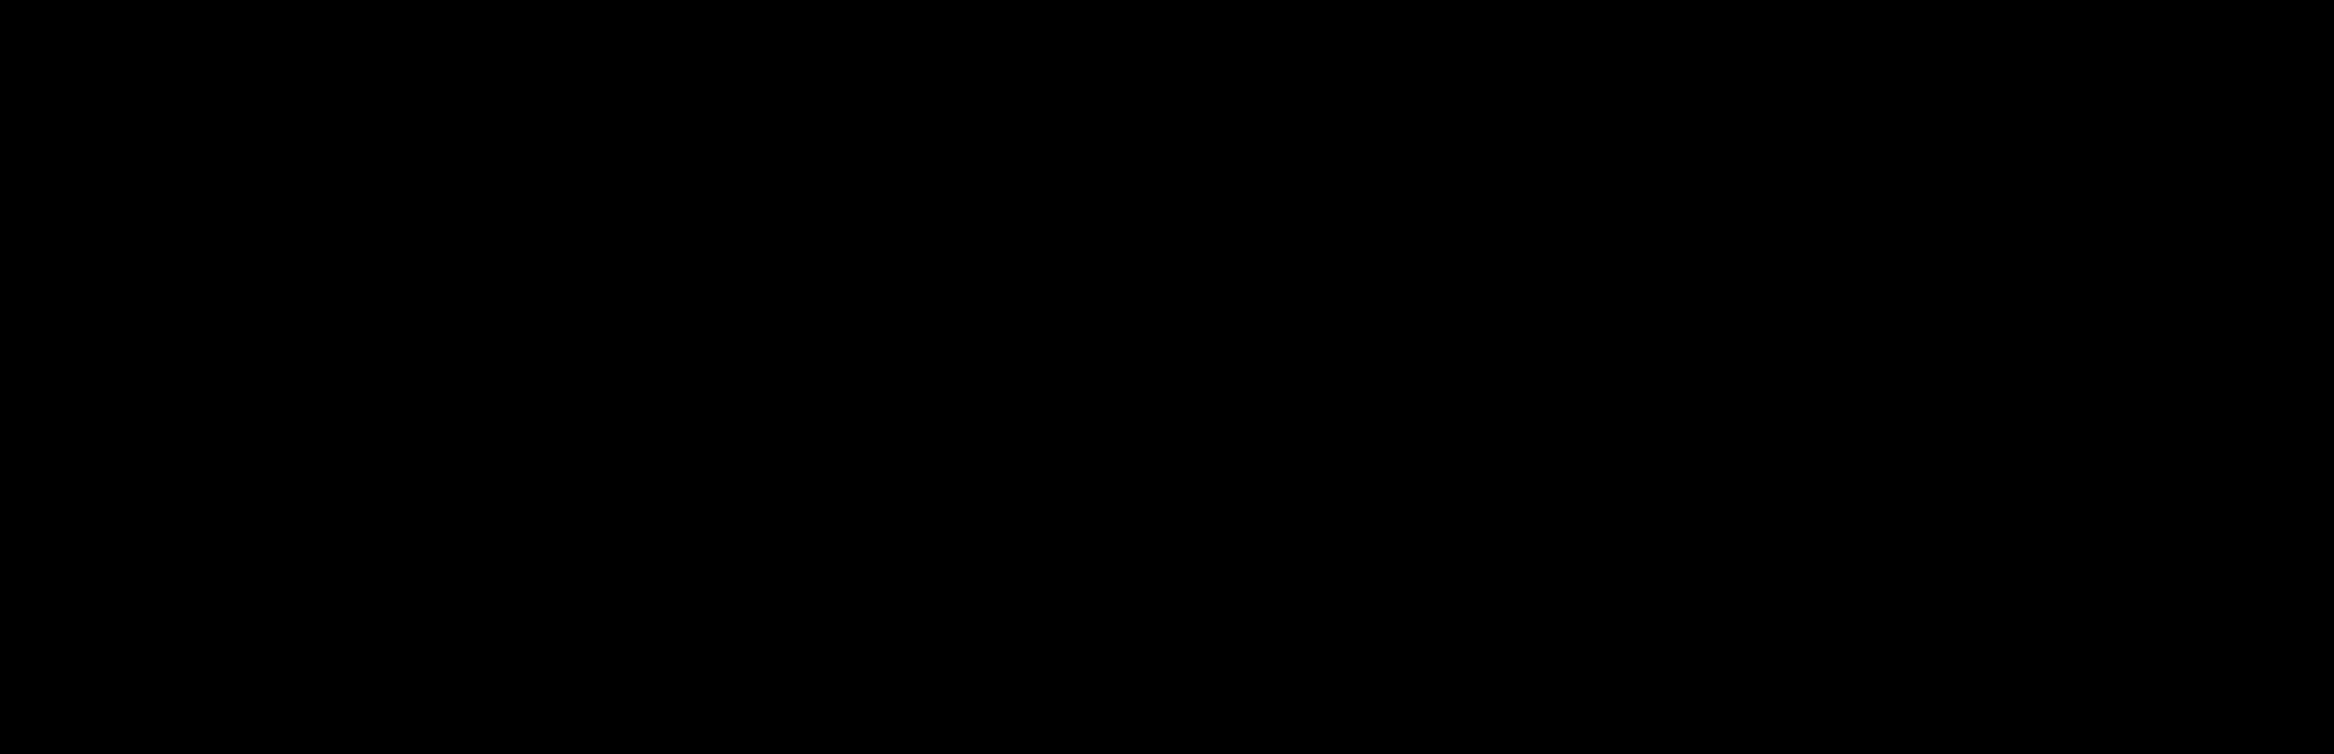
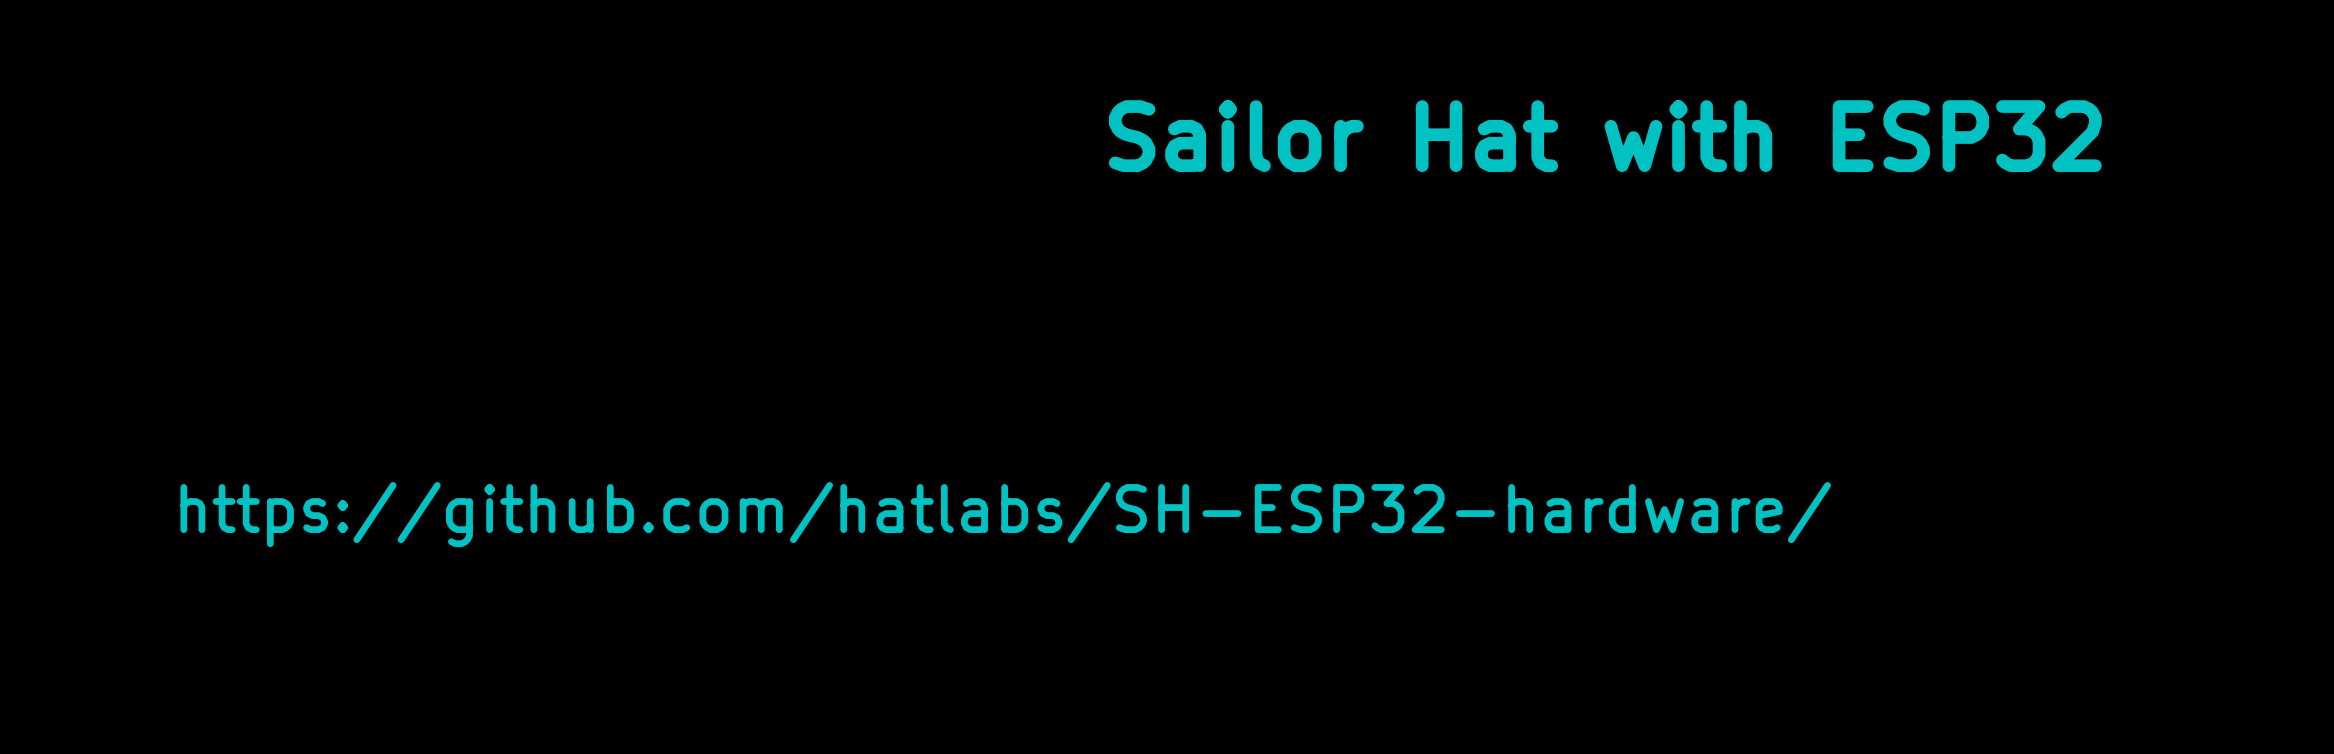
text: none -> Sailor Hat with ESP32 (1605, 136)
text: none -> https://github.com/hatlabs/SH-ESP32-hardware/ (1005, 514)

